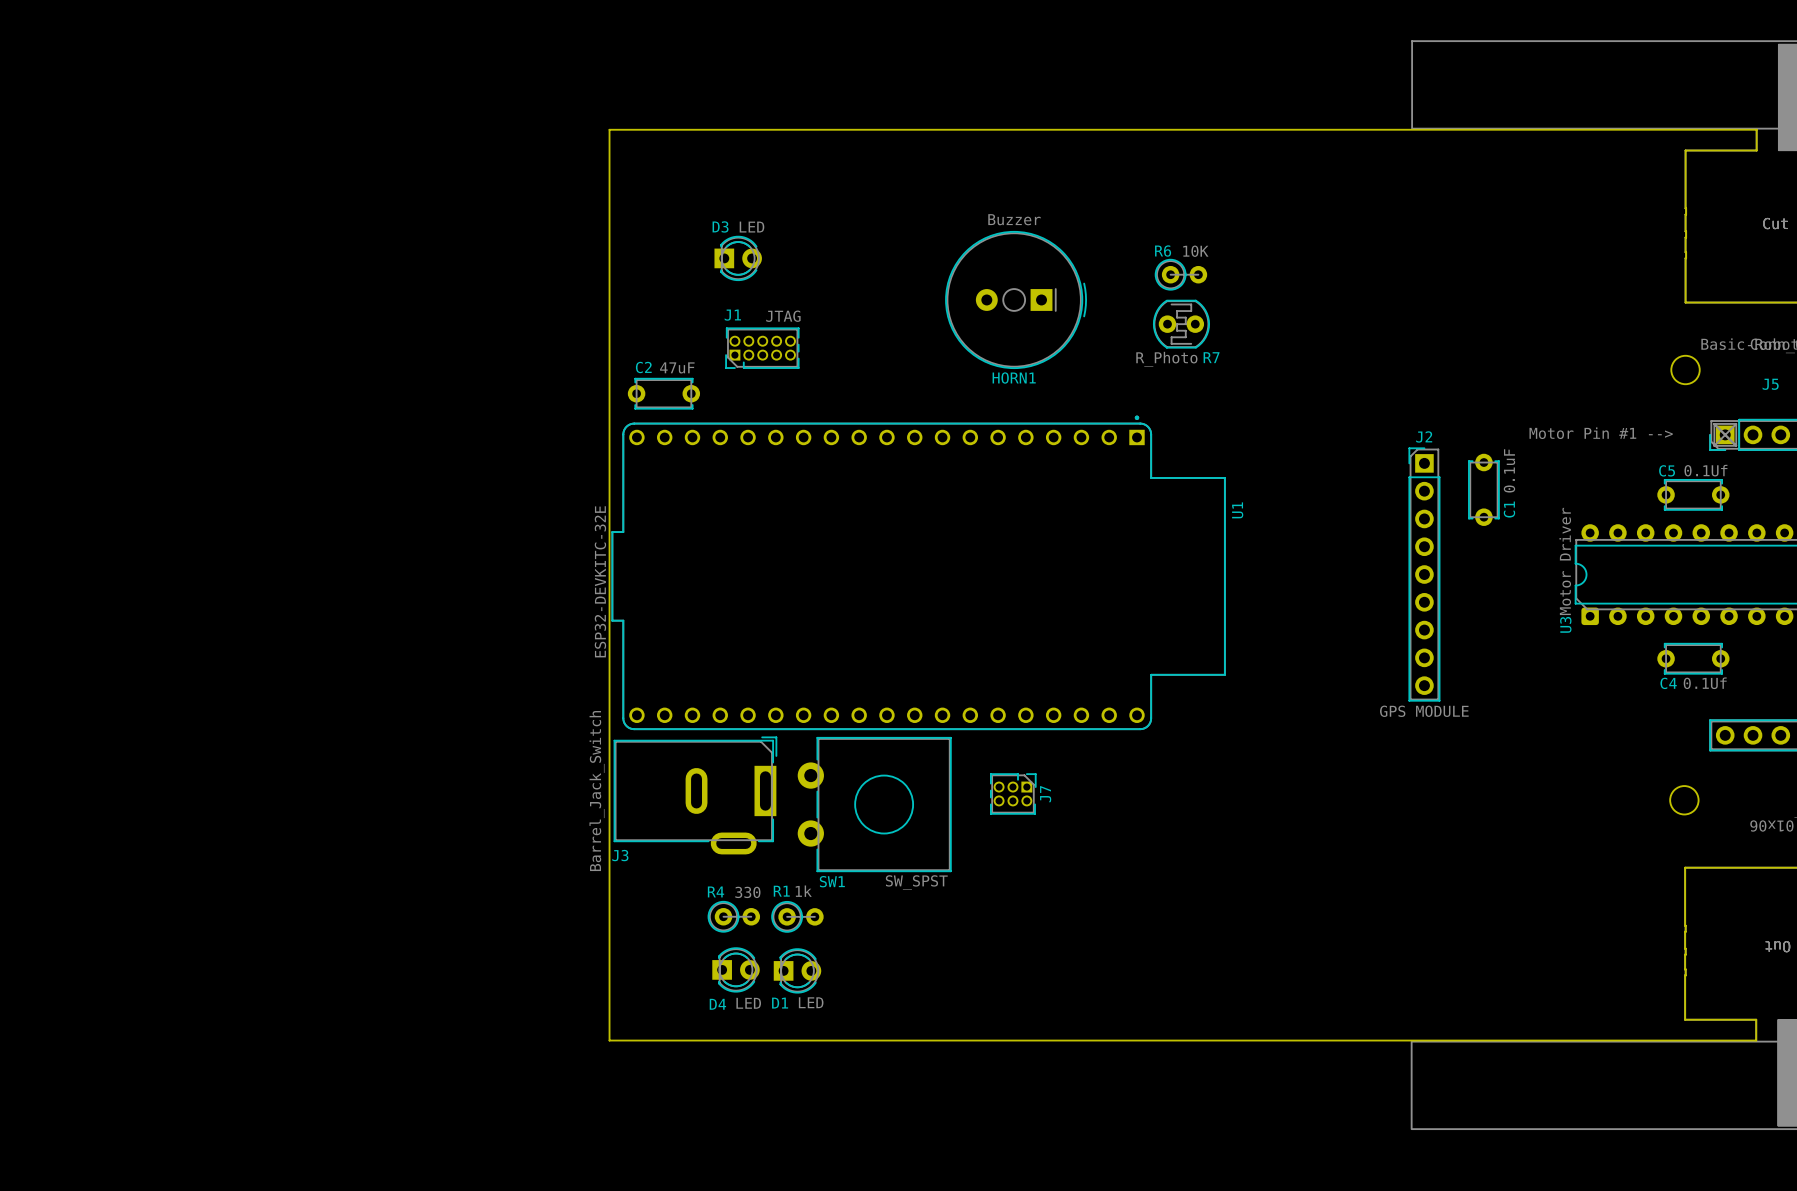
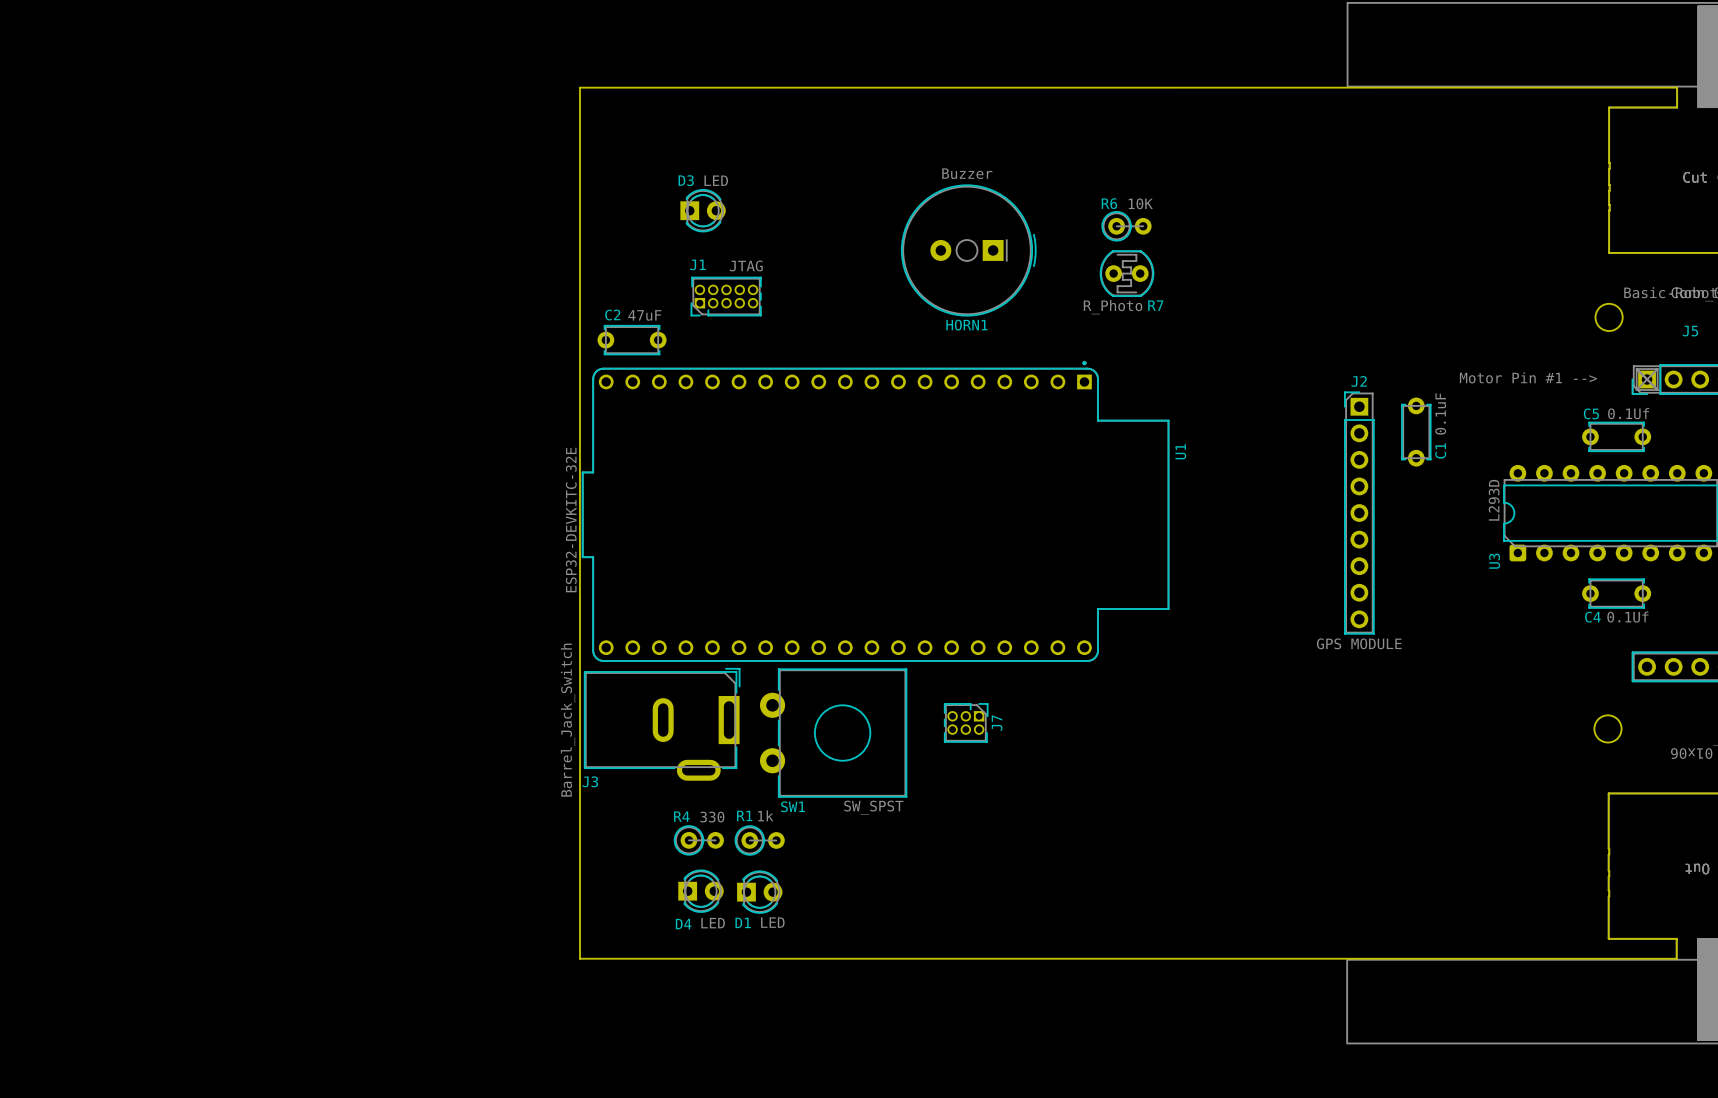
U3 value: Motor Driver (1565, 561) -> L293D (1494, 500)

